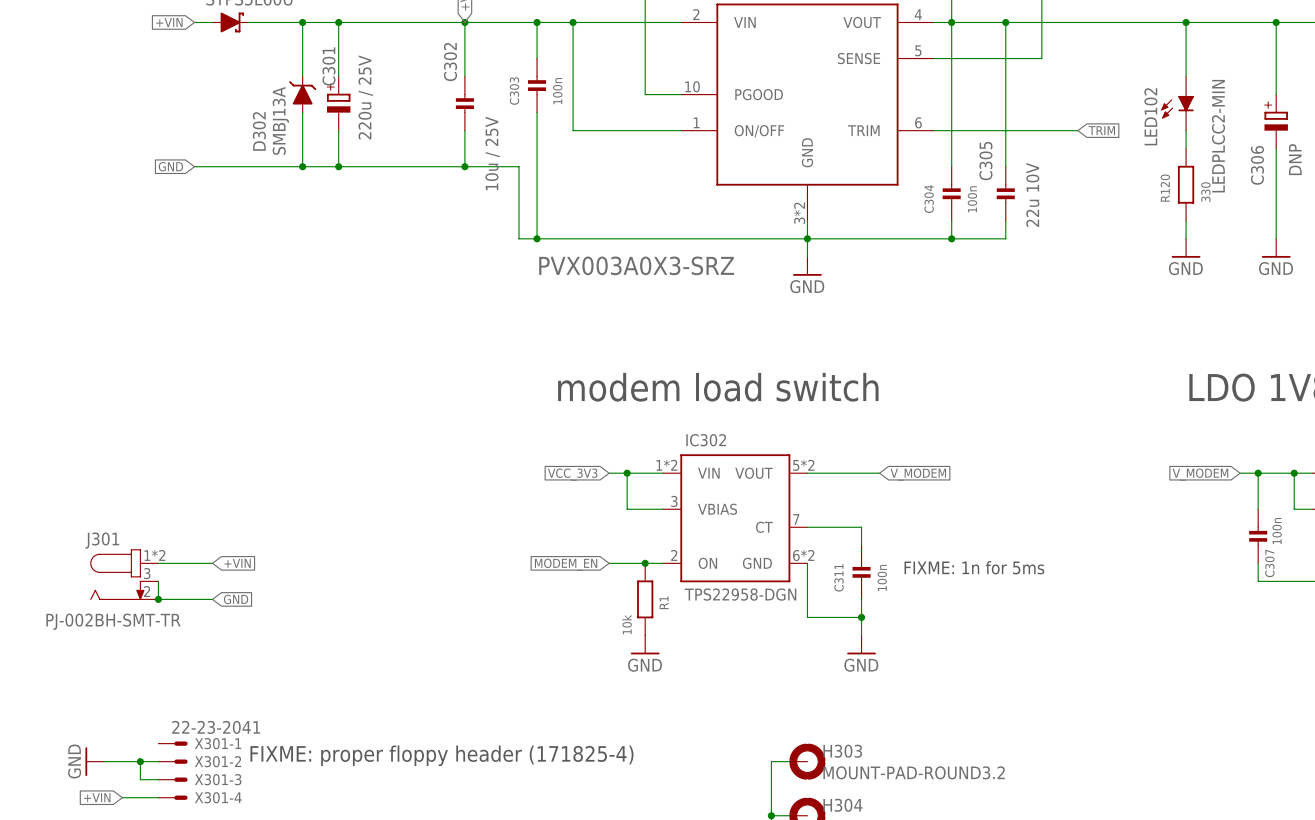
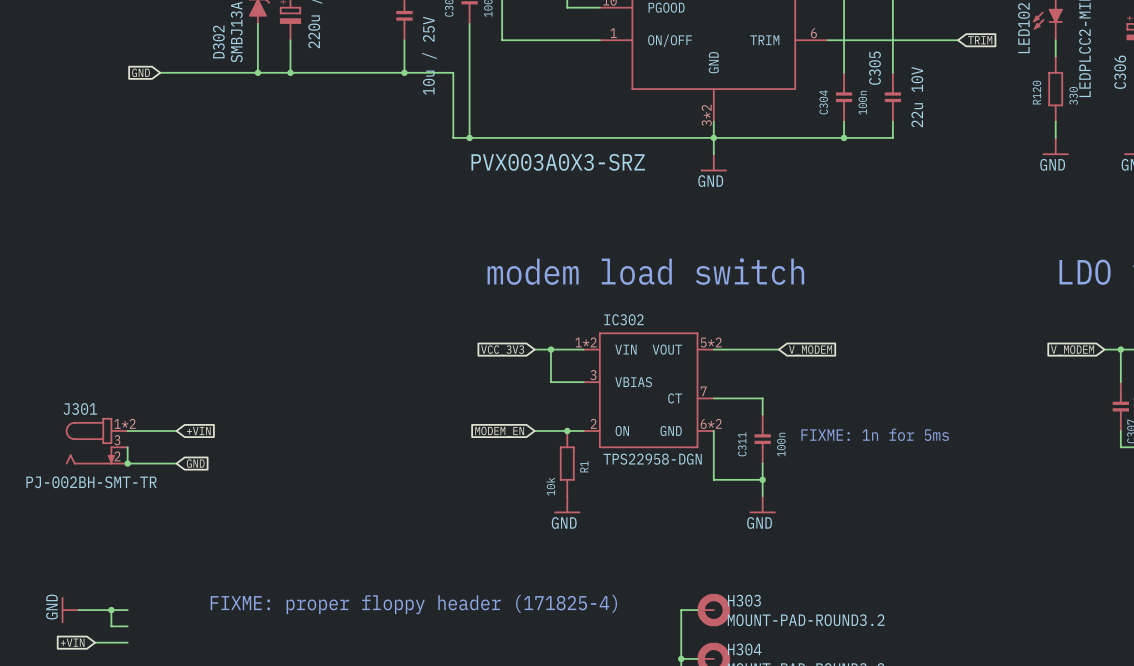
X301-1: 22-23-2041 (173, 743) -> none
X301-2: (173, 761) -> none
X301-3: (173, 779) -> none
X301-4: (173, 797) -> none

